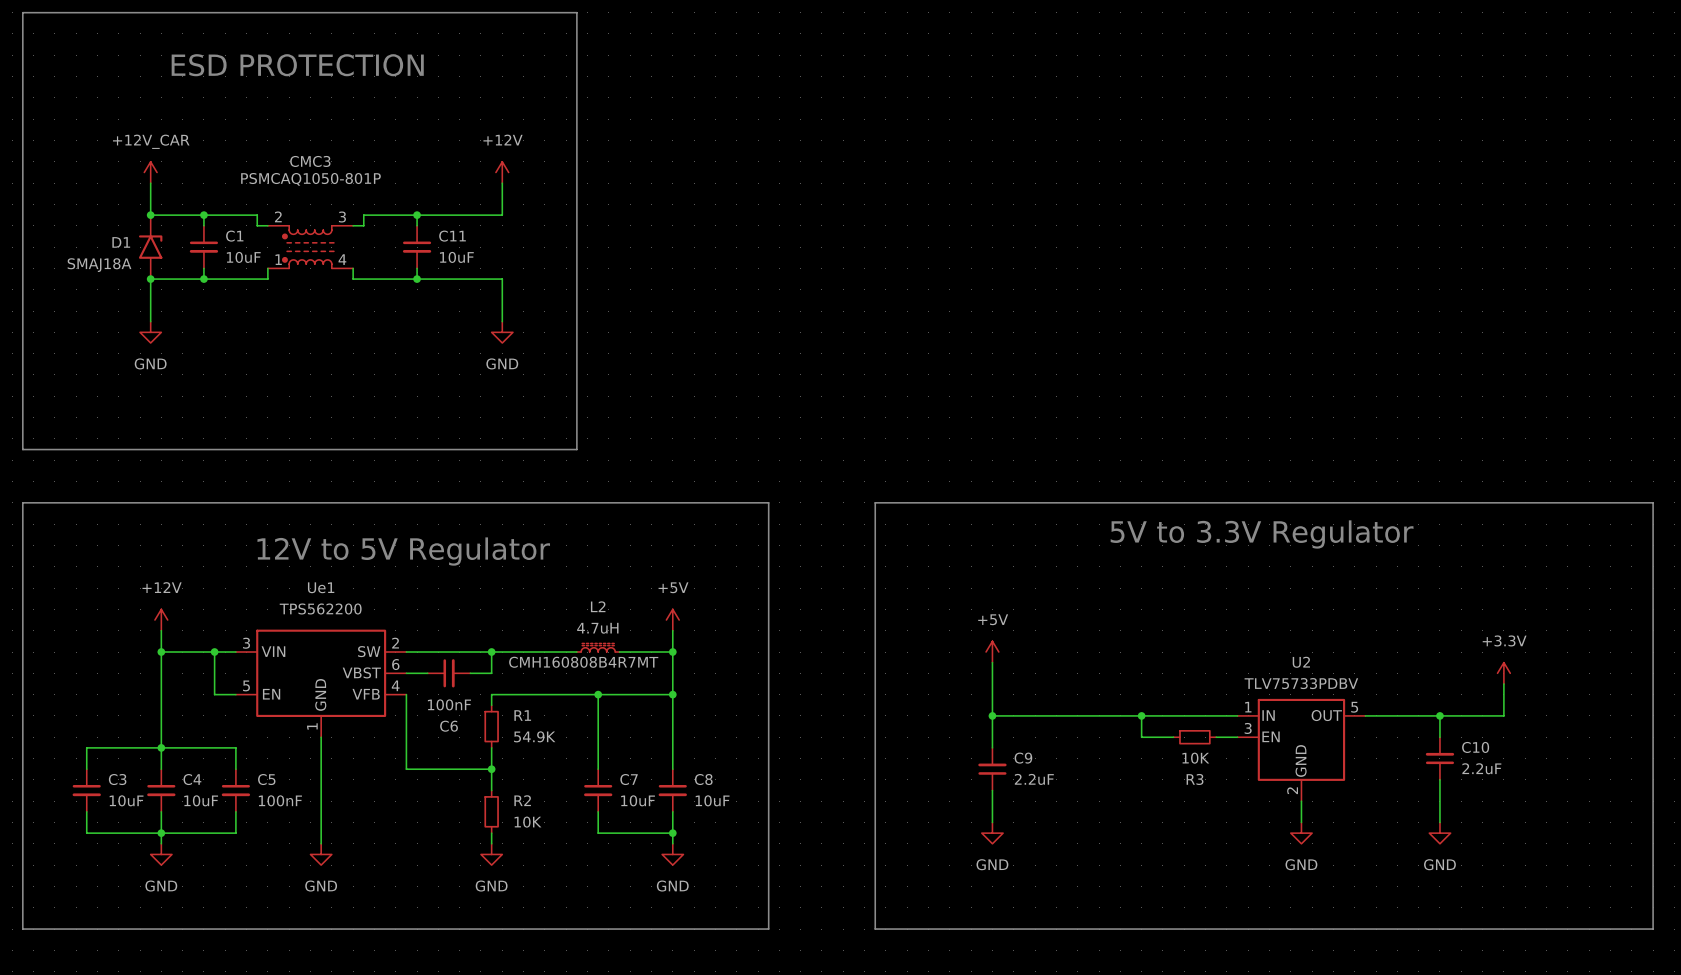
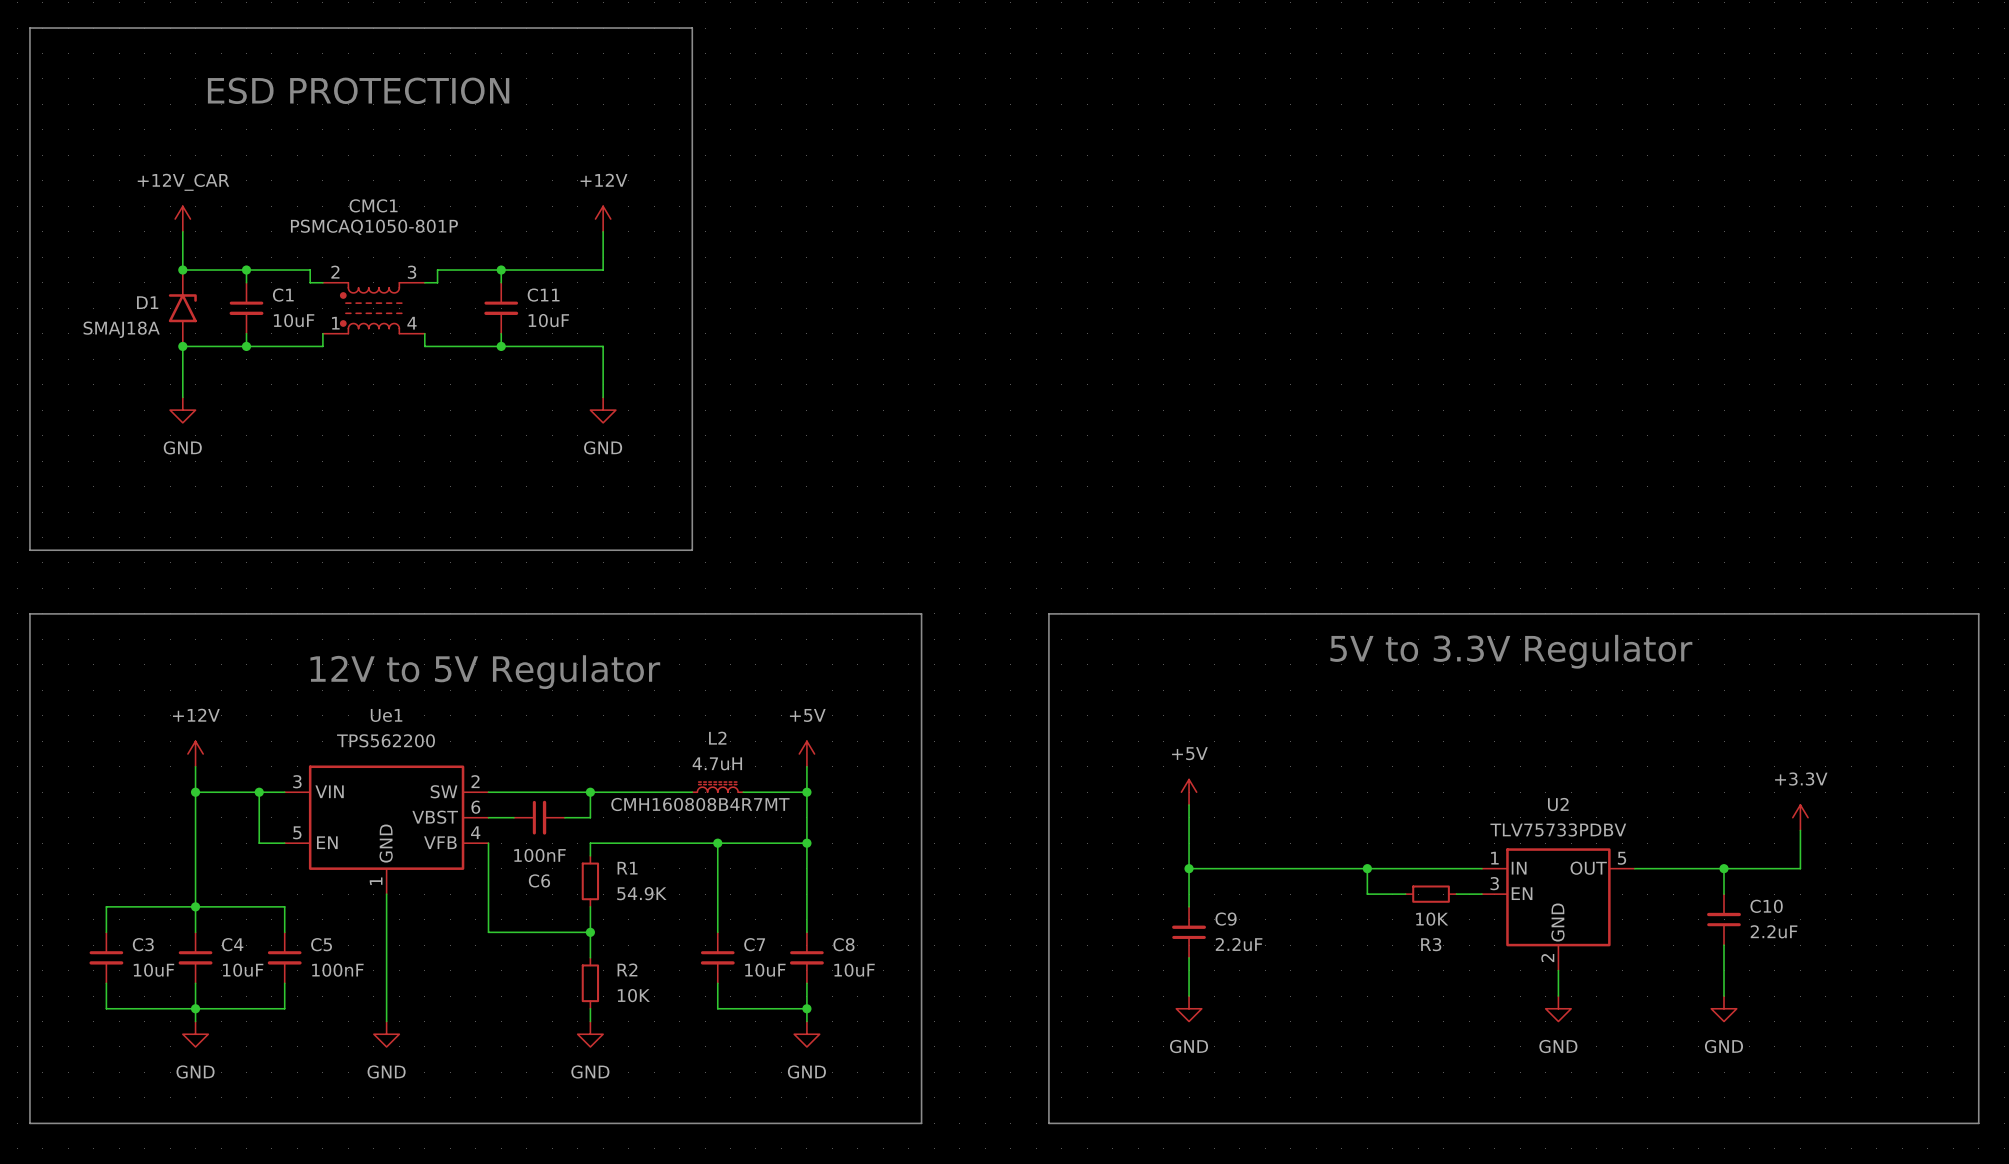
CMC3 name: CMC3 (310, 161) -> CMC1 (373, 205)

